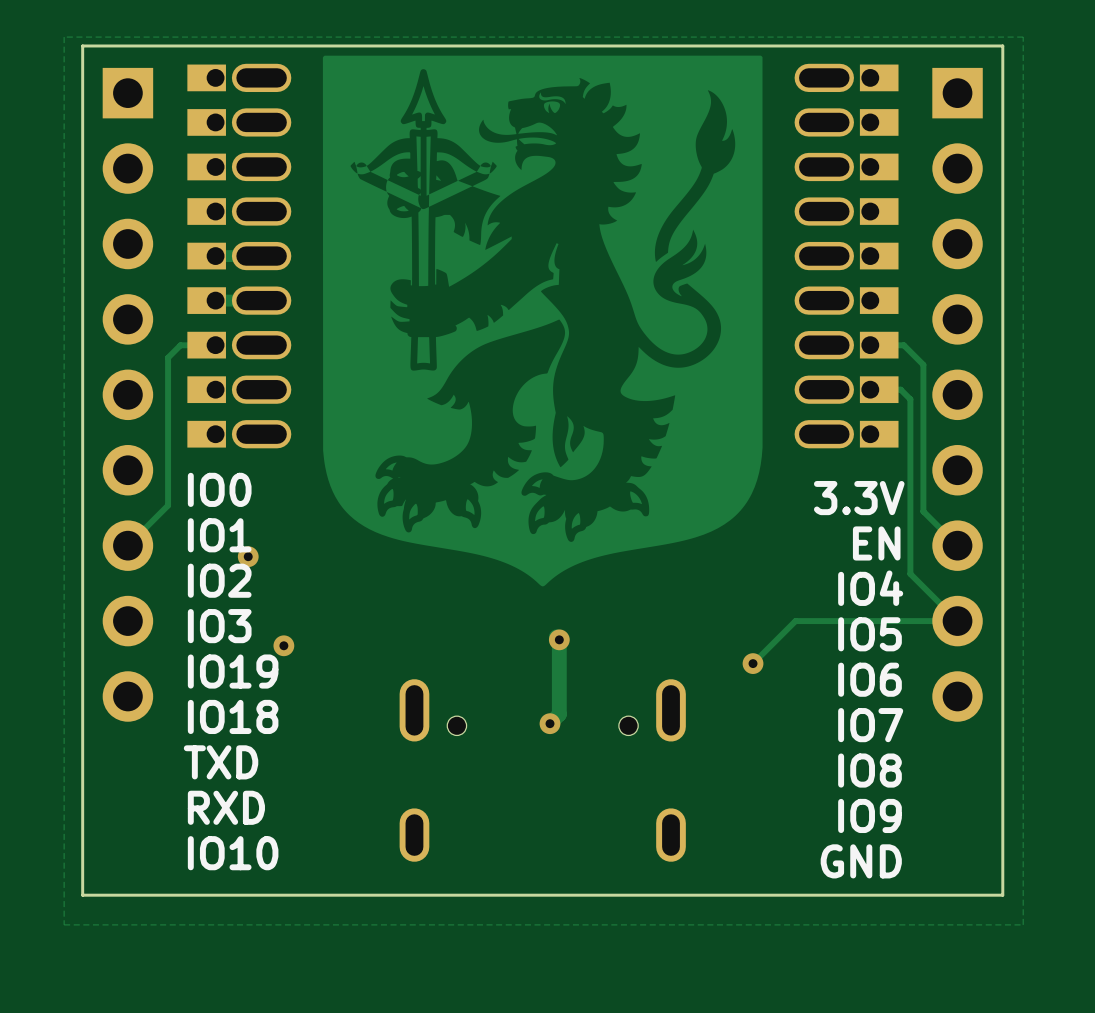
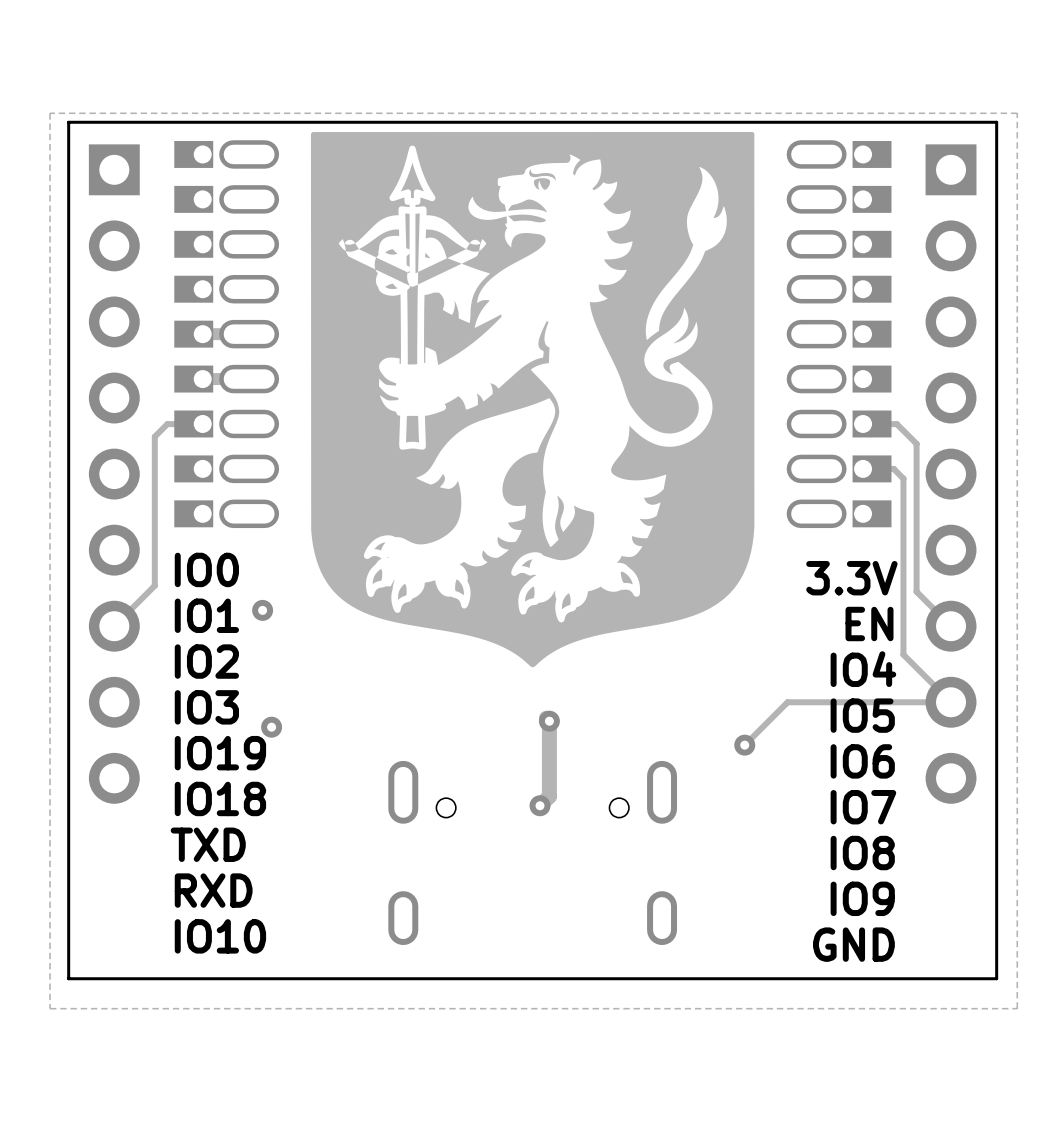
via position: (248, 556) -> (262, 610)

